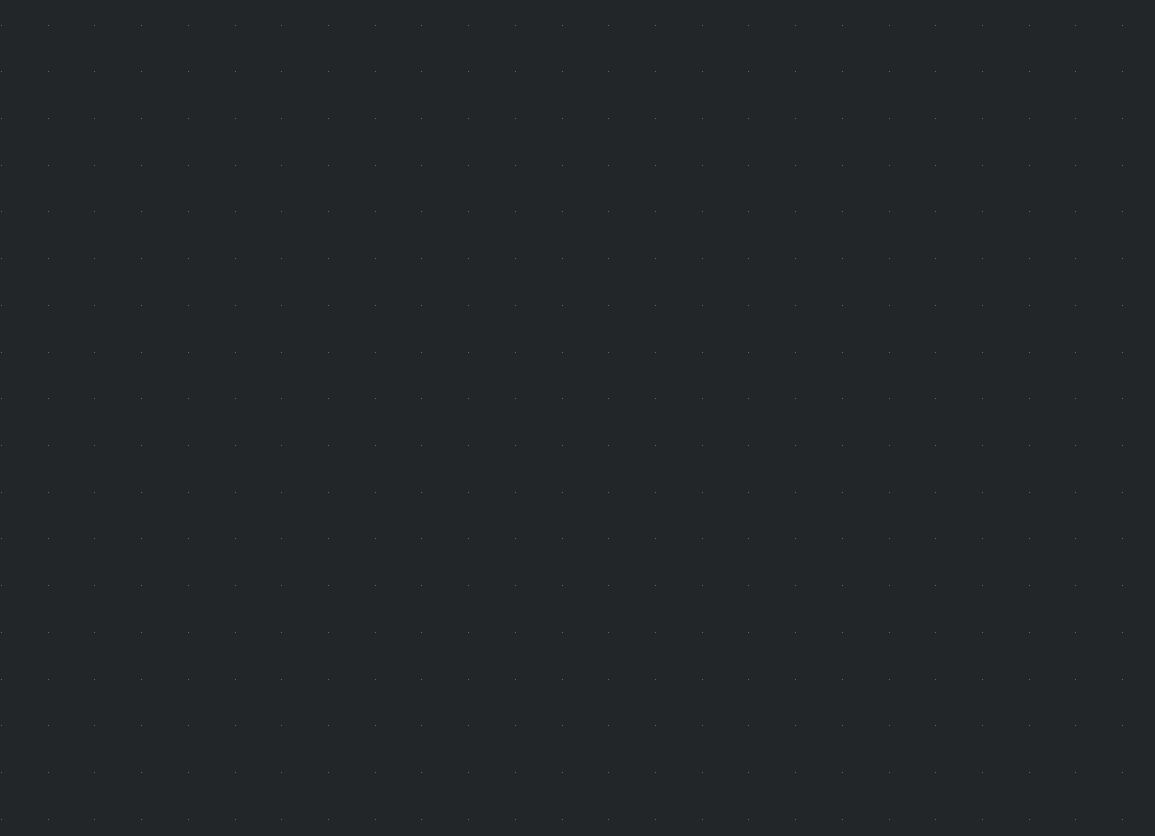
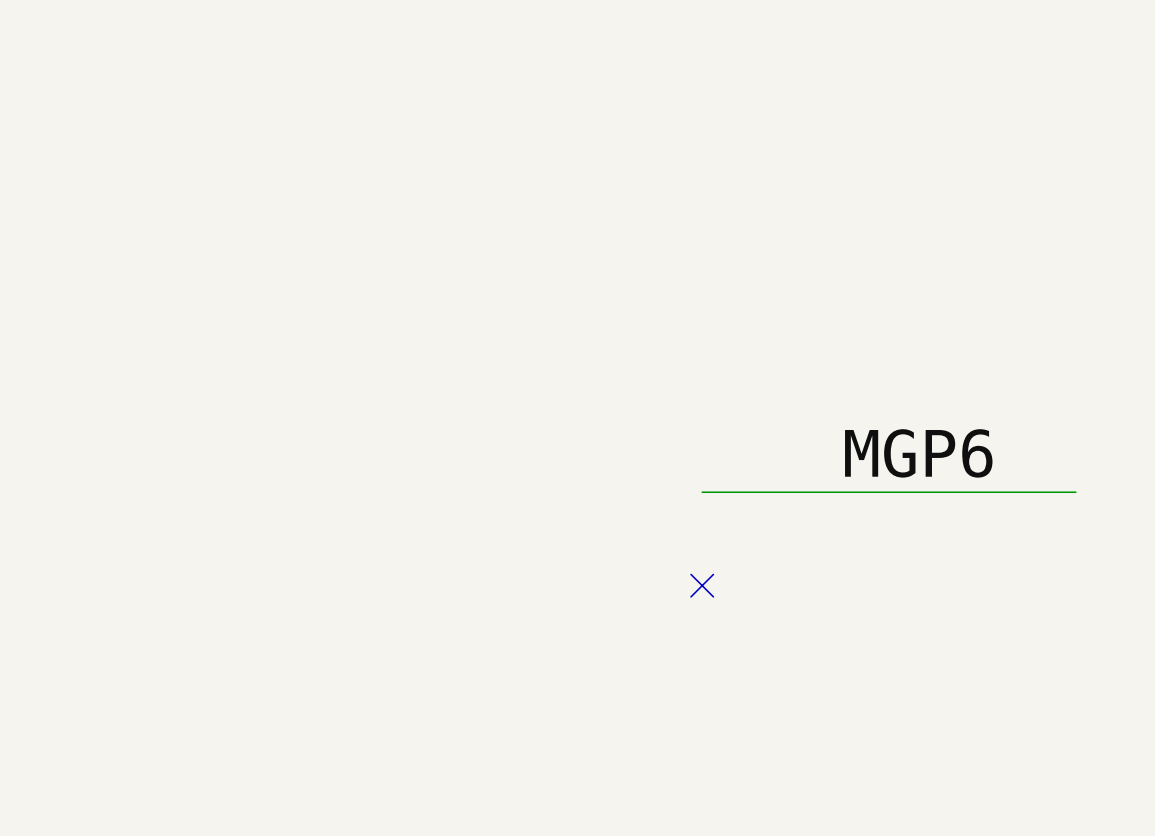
label: none -> MGP6 (918, 453)
wire: none -> (702, 492) (1075, 492)
no-connect mark: none -> (702, 585)

